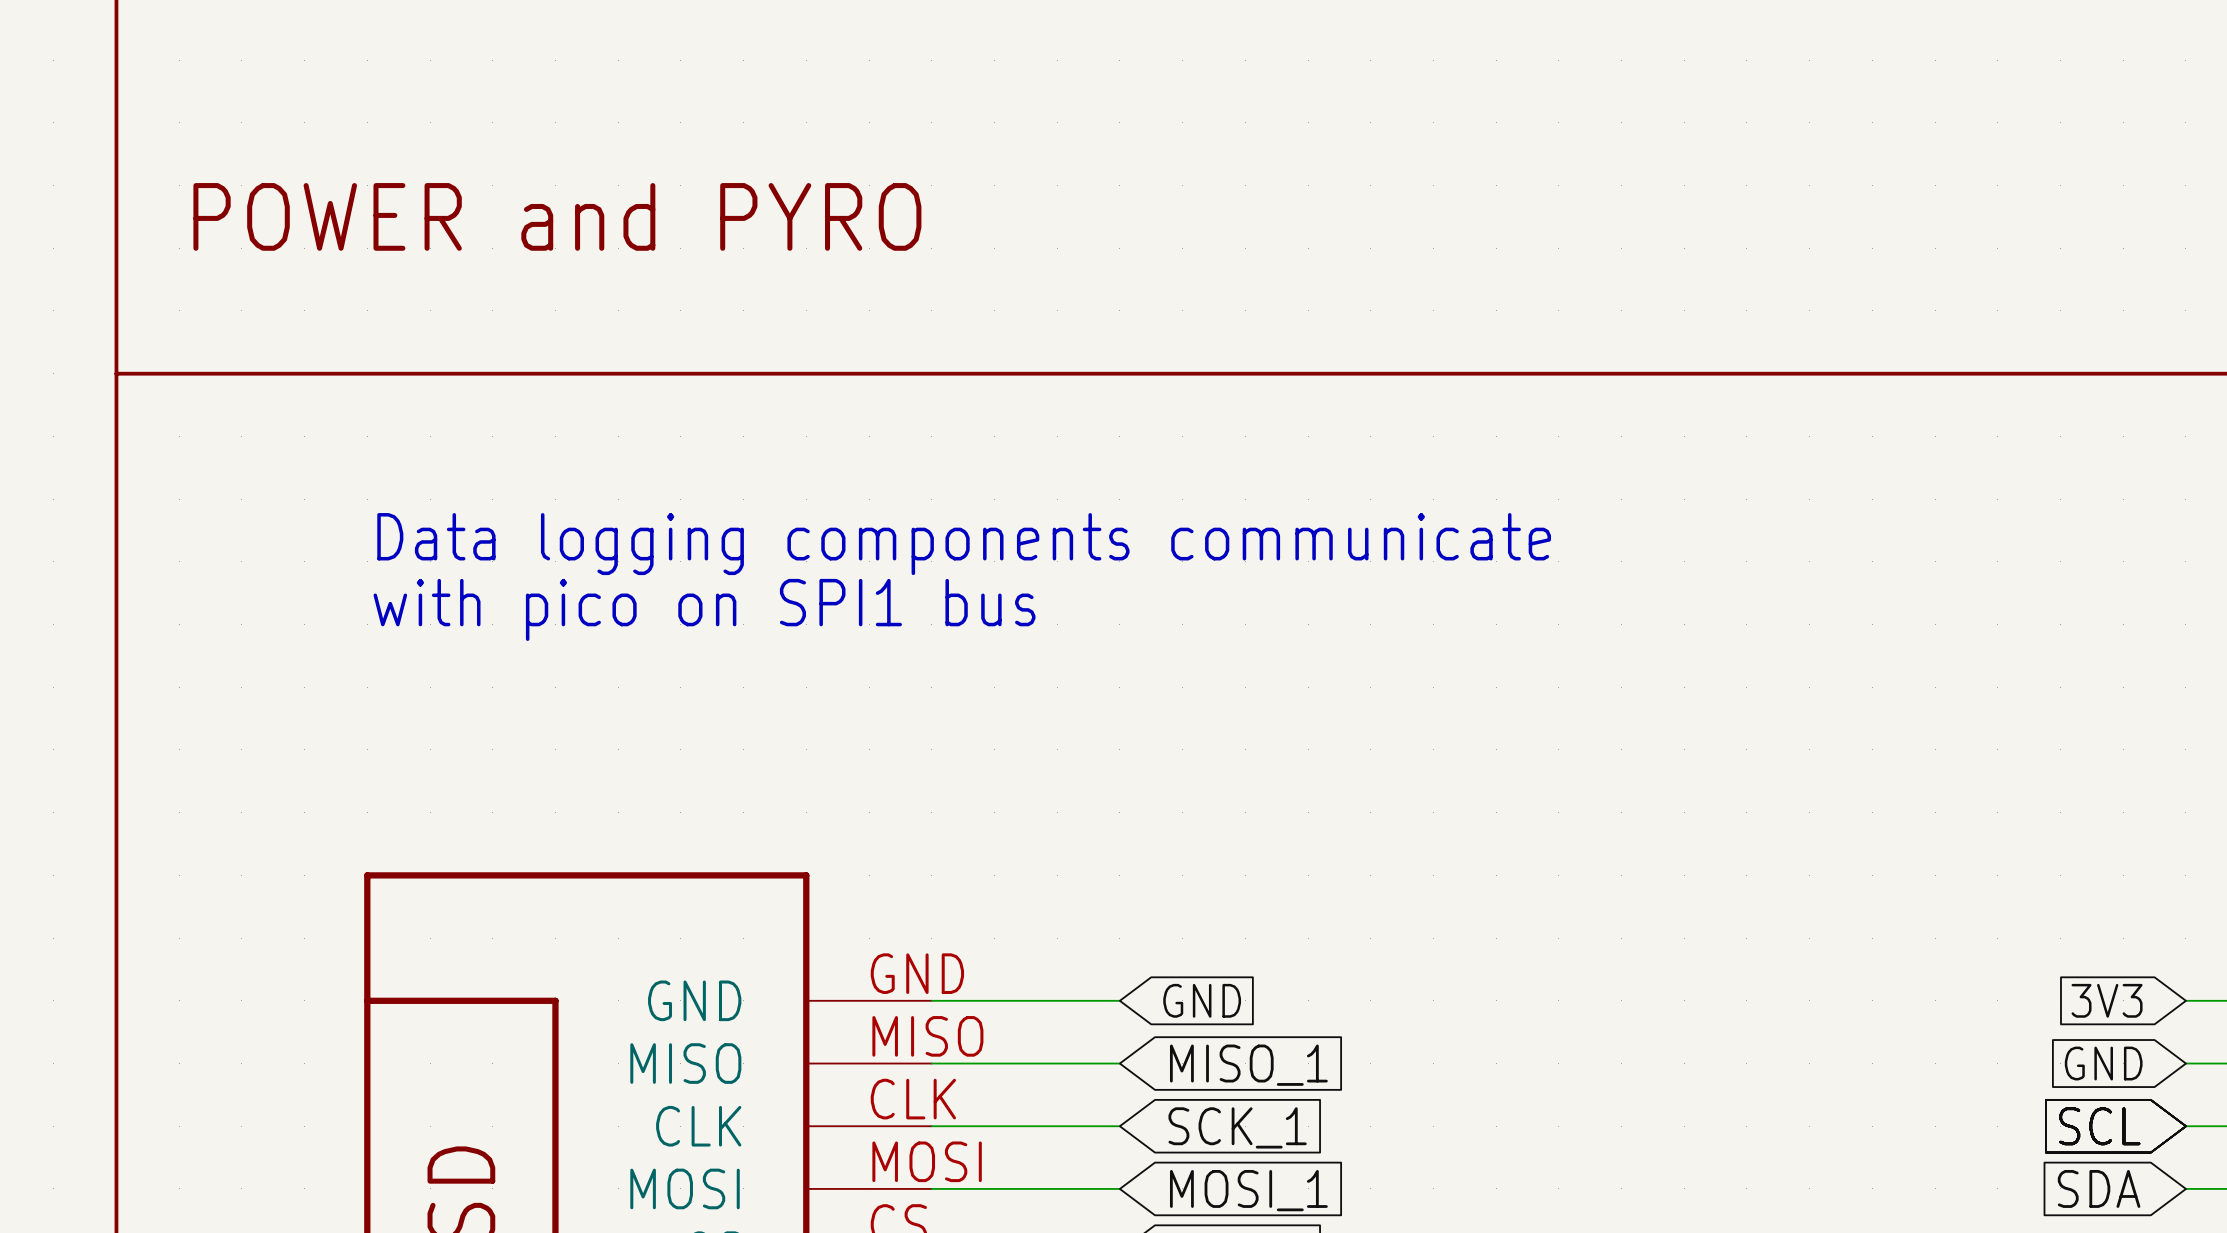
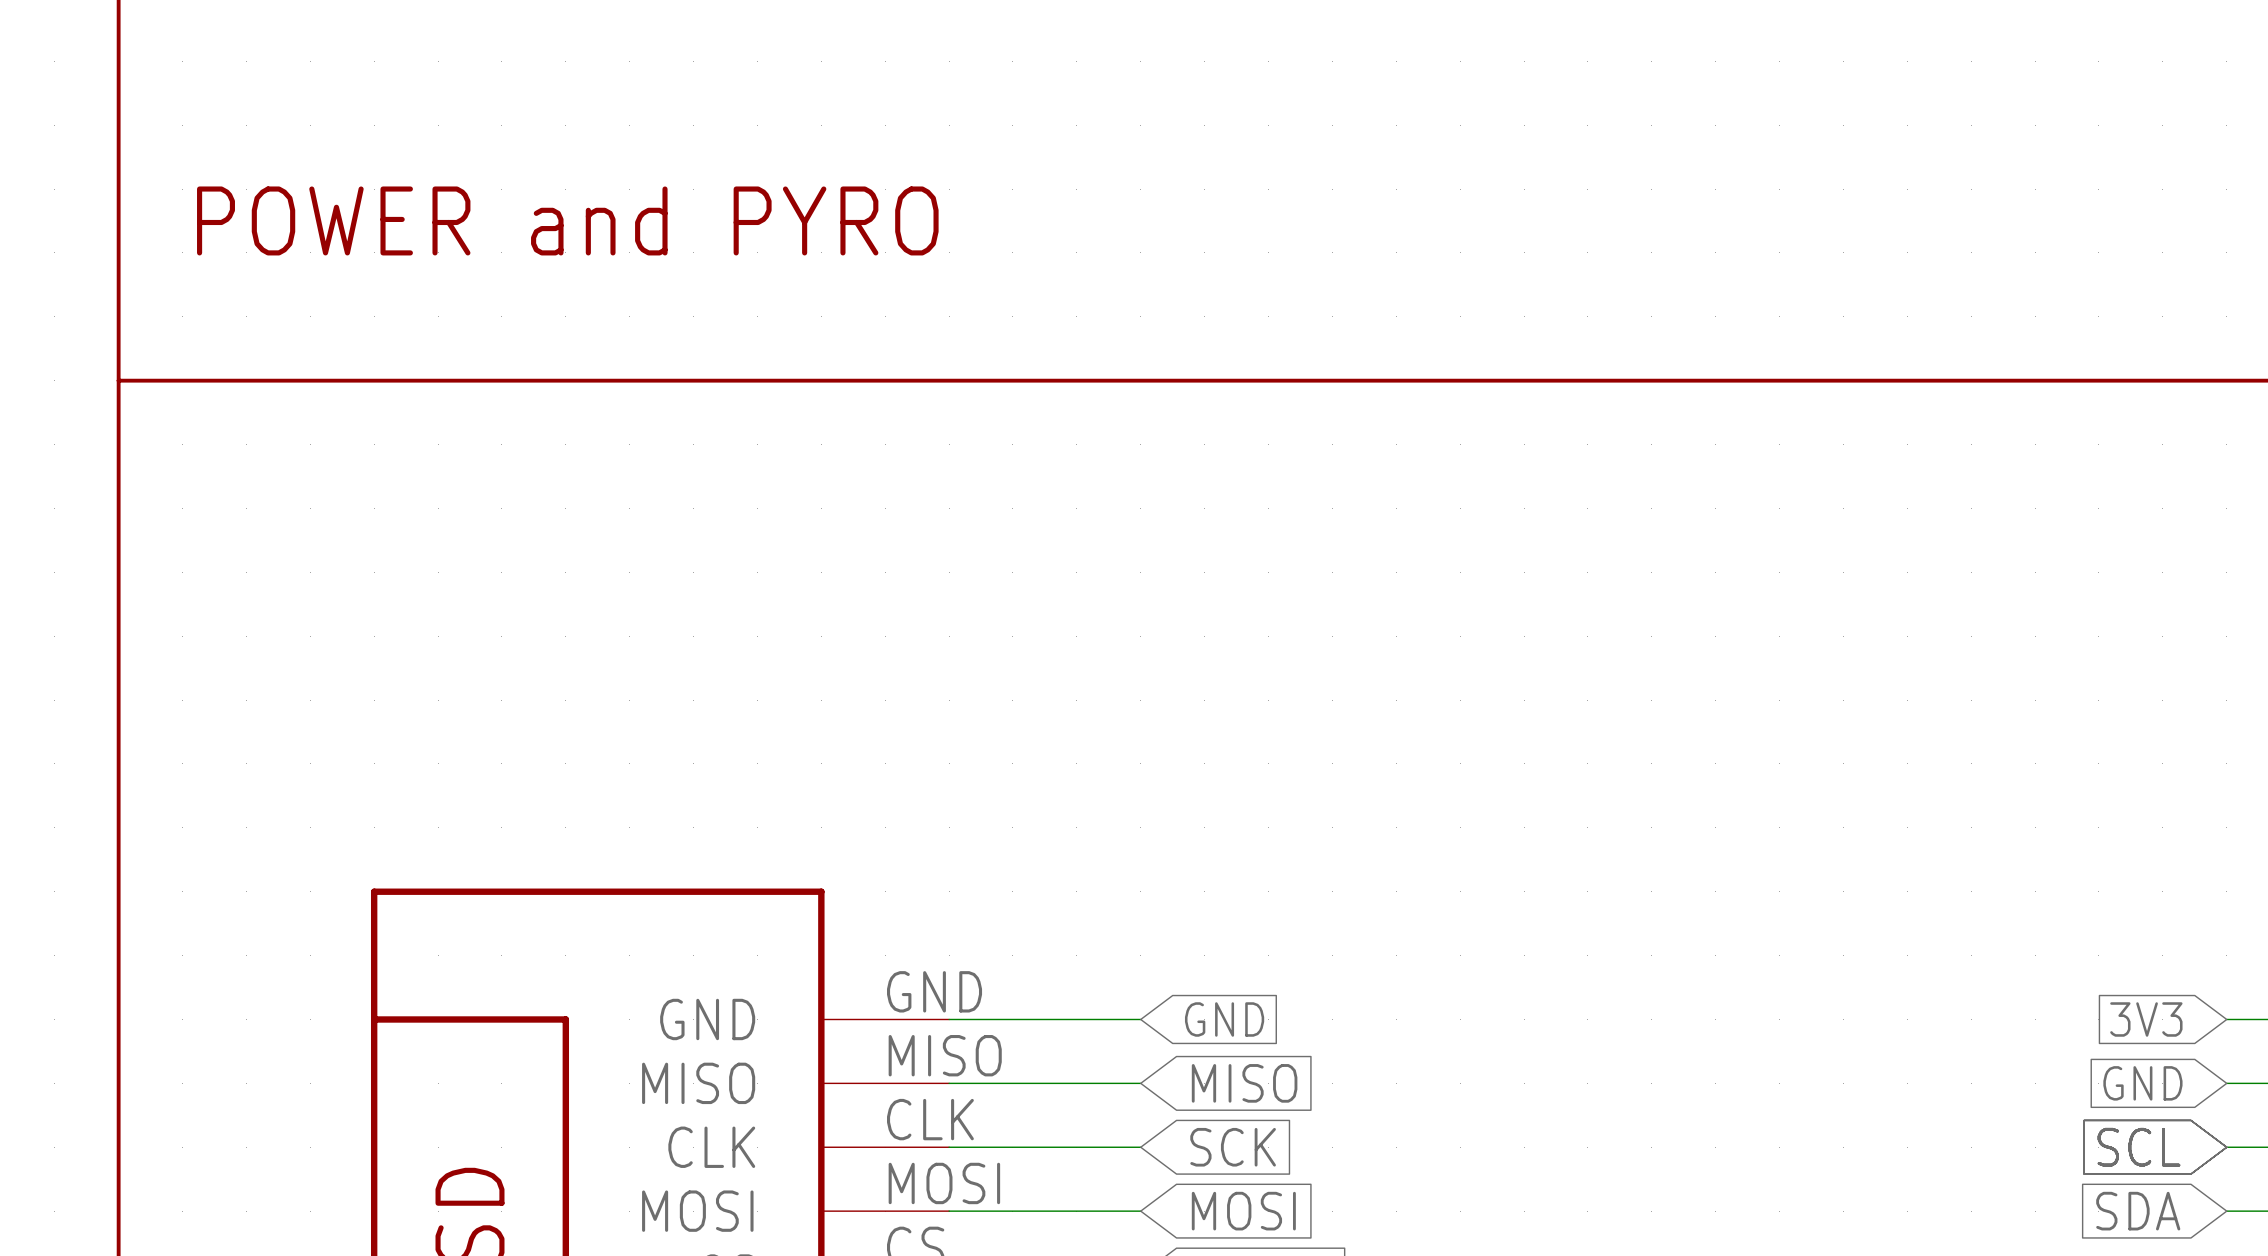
text: Data logging components communicate (964, 544) -> none
text: with pico on SPI1 bus (704, 609) -> none
global label: MISO_1 (1248, 1065) -> MISO (1244, 1083)
global label: SCK_1 (1237, 1127) -> SCK (1233, 1147)
global label: MOSI_1 (1248, 1190) -> MOSI (1243, 1211)

